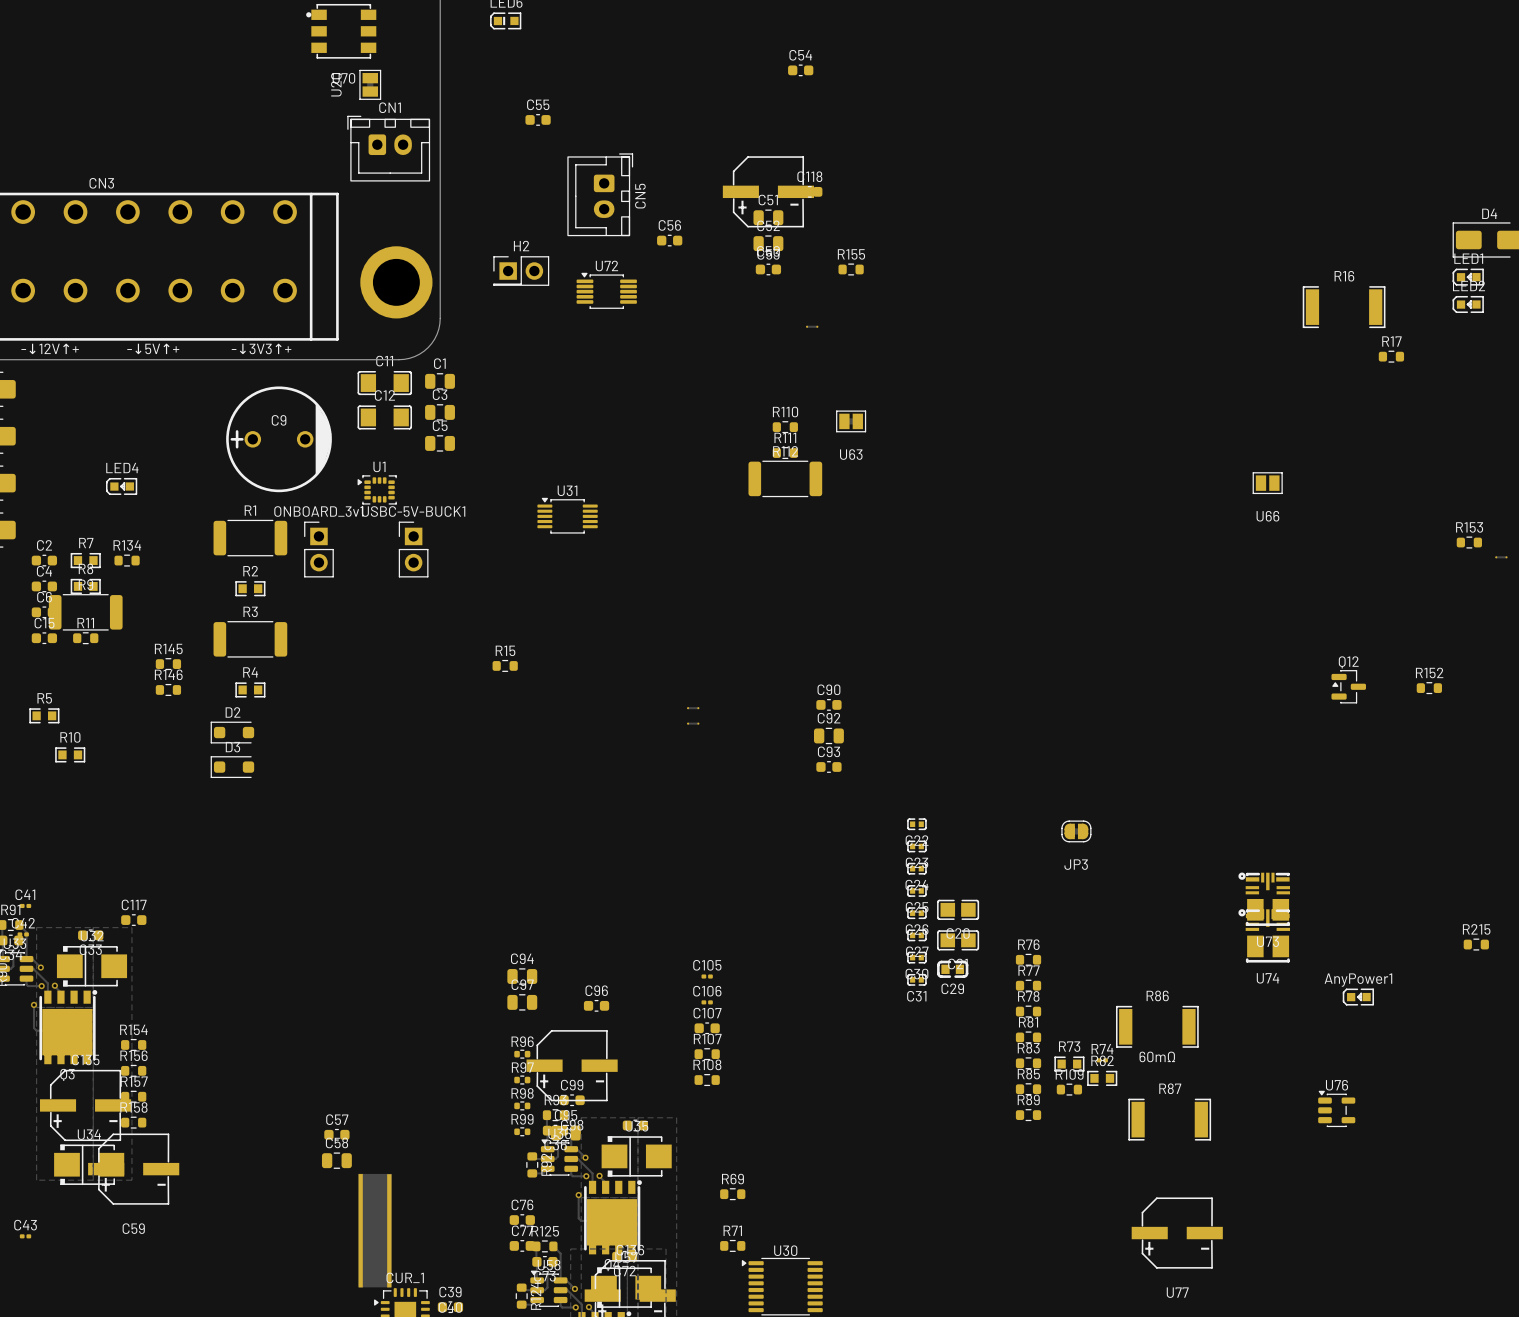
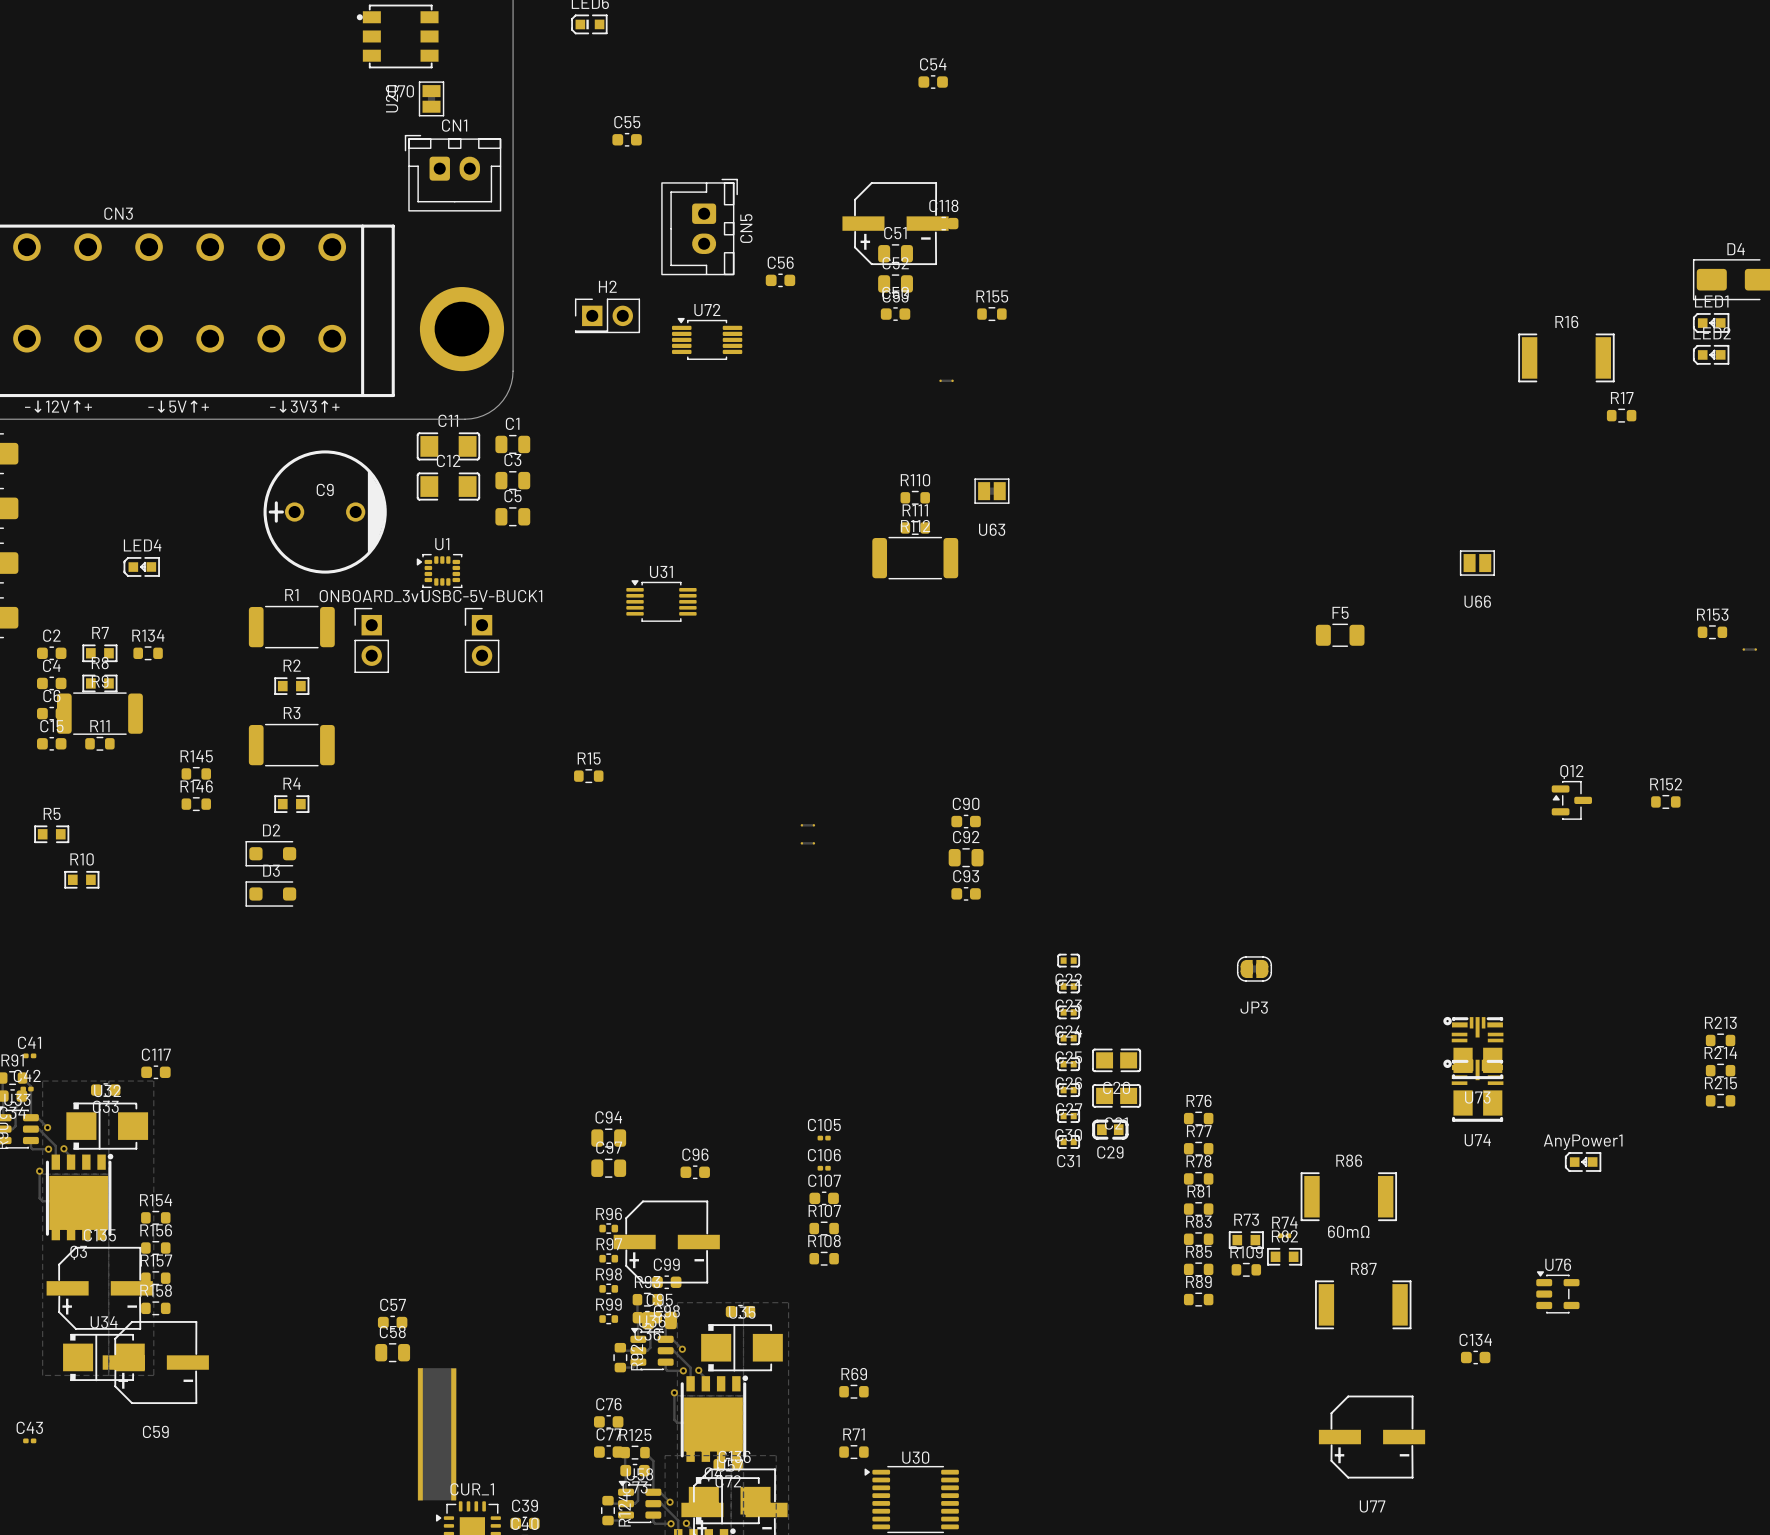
F5: none -> (1340, 635)
R213: none -> (1720, 1040)
R214: none -> (1720, 1070)
C134: none -> (1475, 1357)

